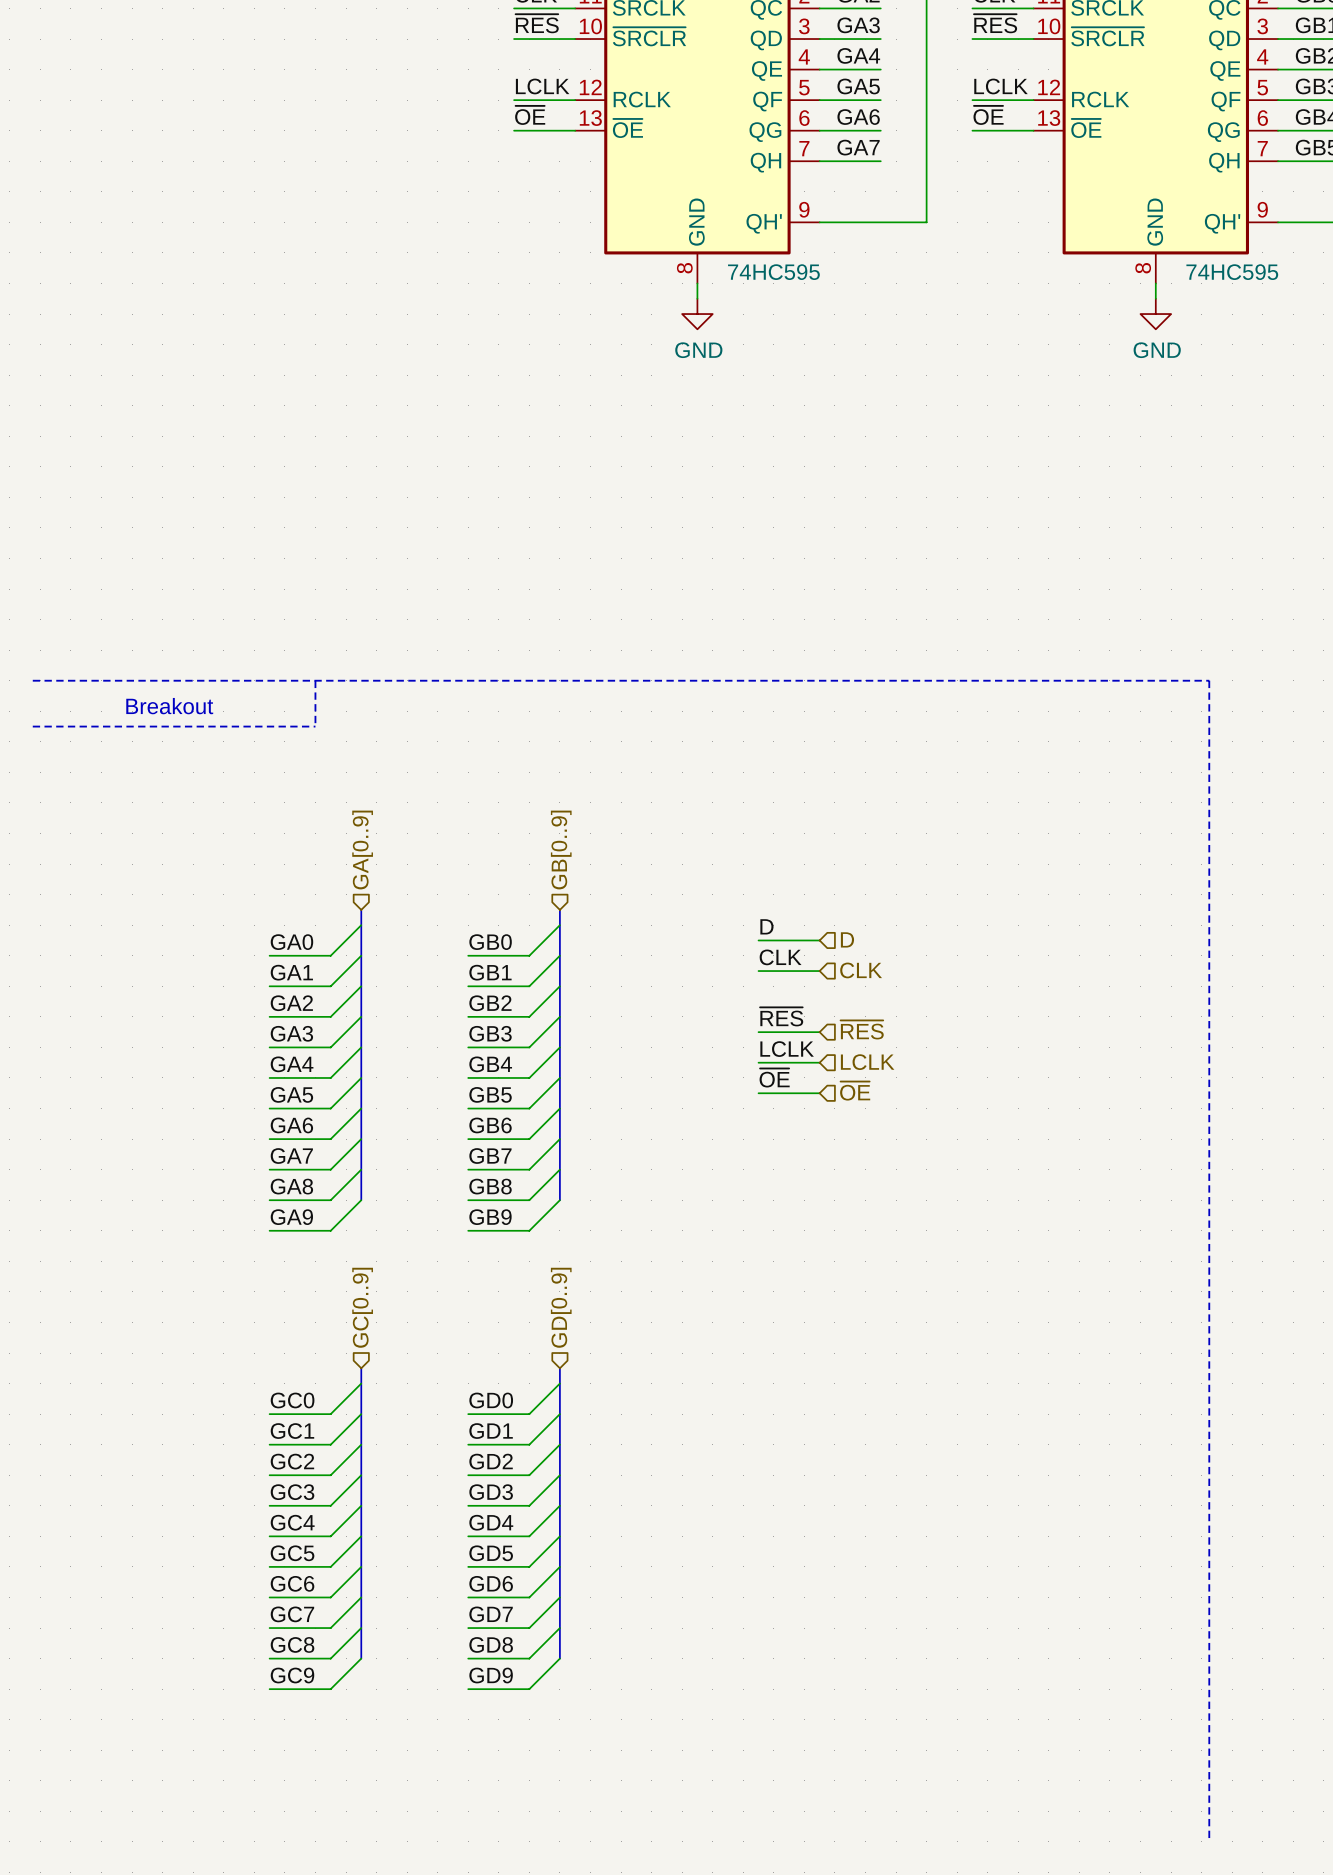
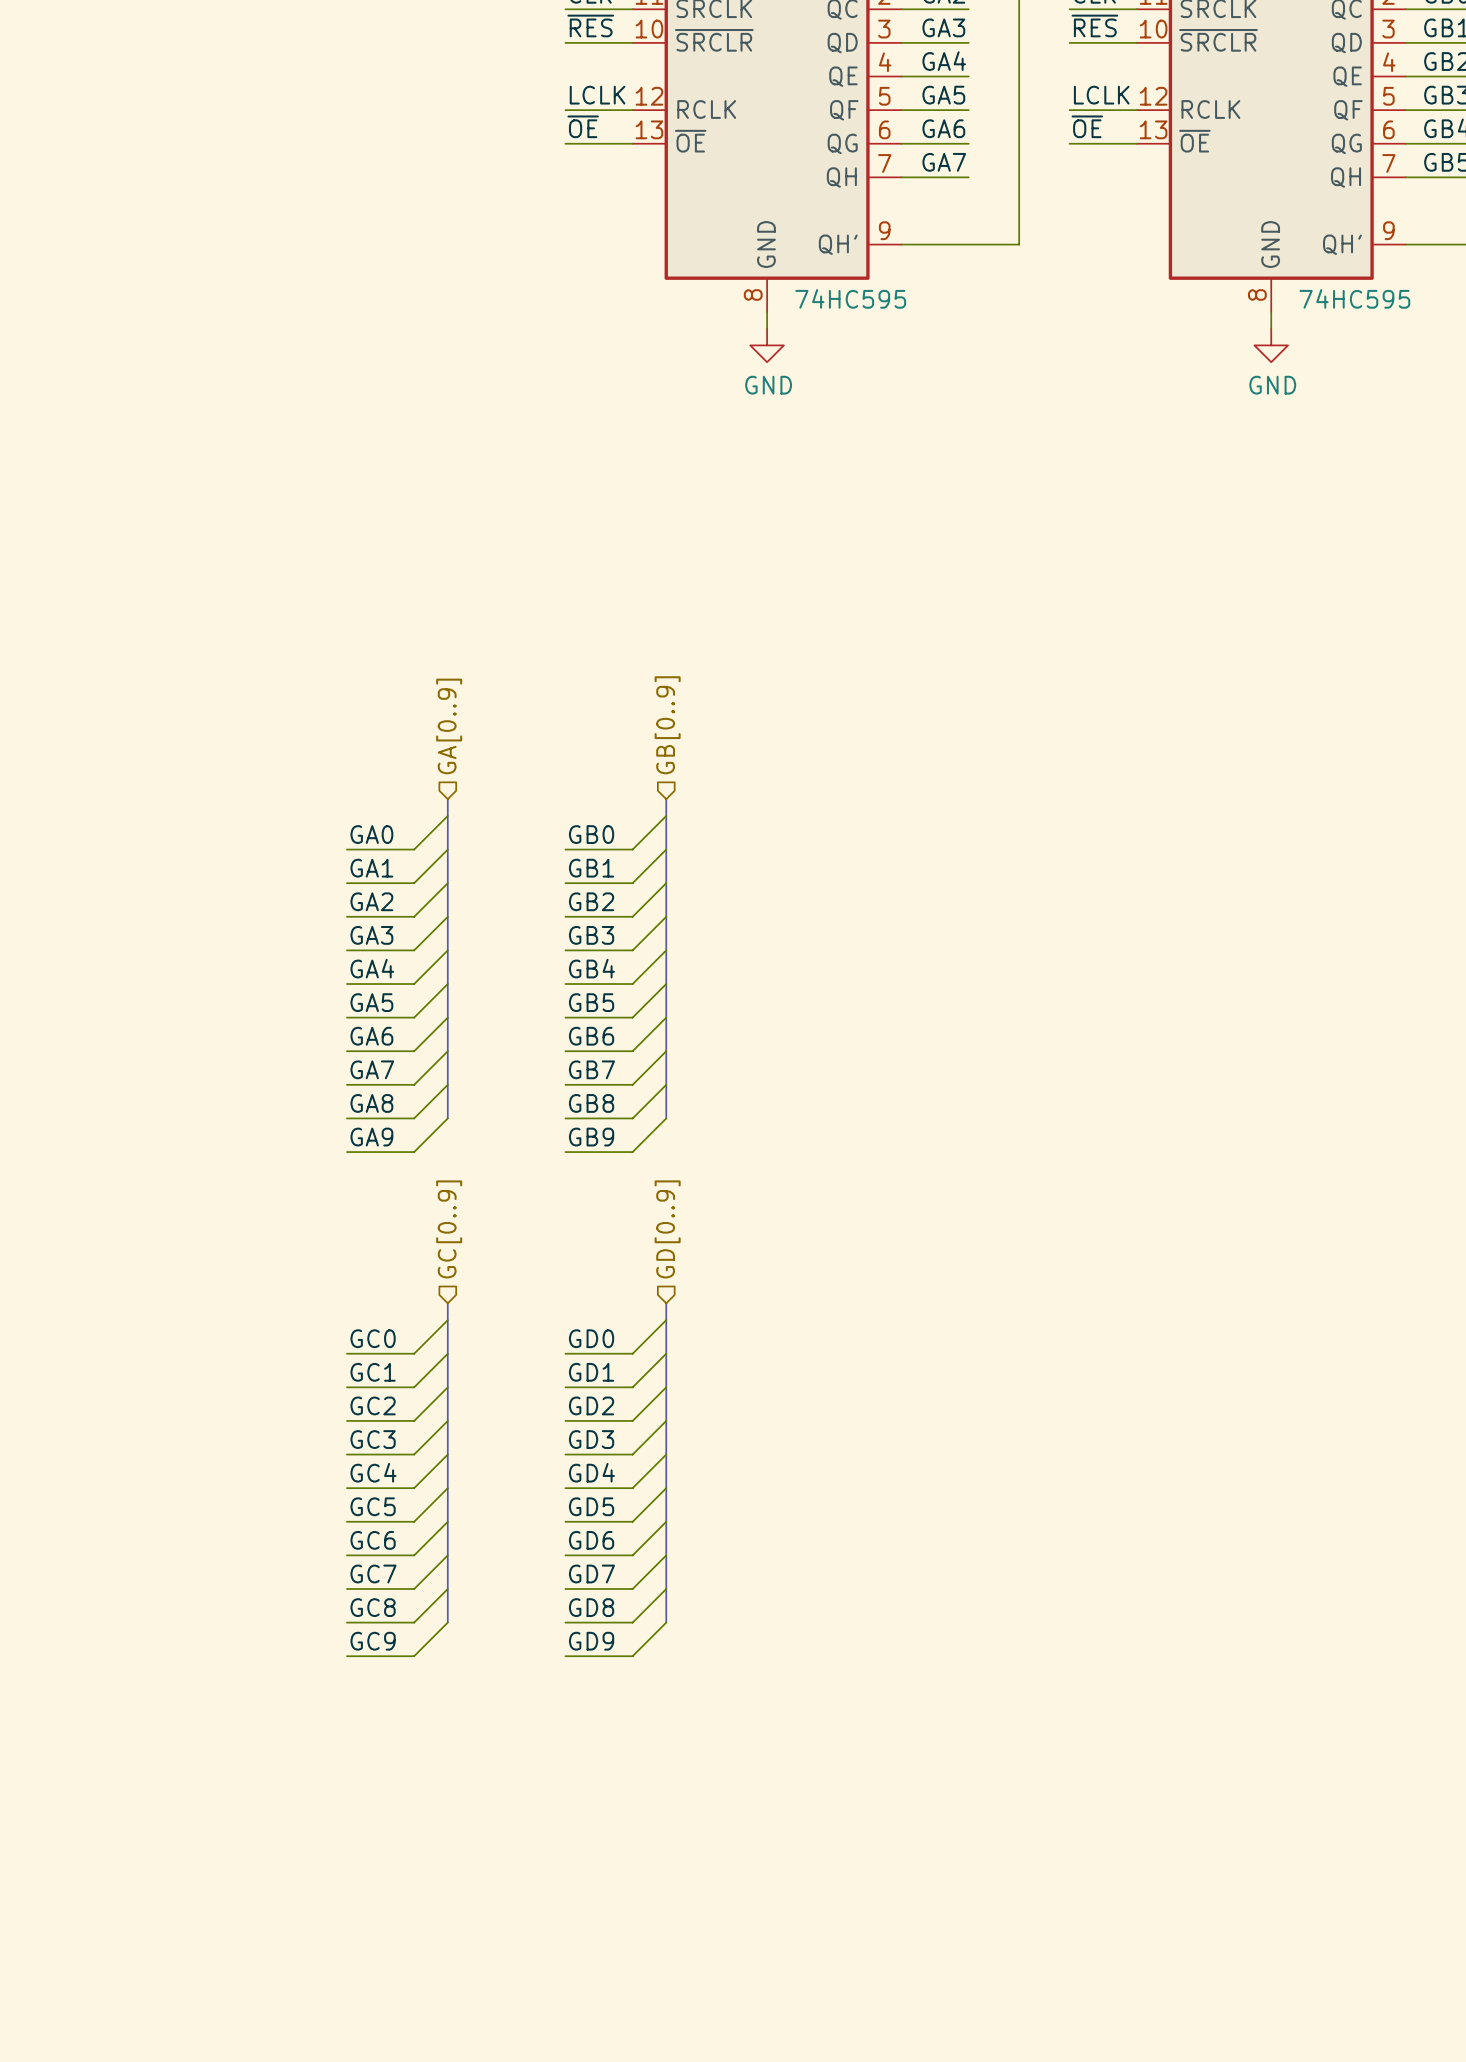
line: (32, 680) (1209, 680) (1209, 1841) -> none
line: (315, 680) (315, 726) (32, 726) -> none
text: Breakout (169, 706) -> none
wire: none -> (447, 815) (414, 849) (346, 849)
wire: none -> (666, 815) (632, 849) (565, 849)
hierarchical label position: GA[0..9] (362, 850) -> GA[0..9] (449, 726)
hierarchical label position: GB[0..9] (561, 850) -> GB[0..9] (667, 725)
bus: (361, 909) (361, 1200) -> (447, 799) (447, 1118)
bus: (559, 909) (559, 1200) -> (666, 799) (666, 1118)
wire: (361, 925) (330, 955) -> (447, 1017) (414, 1051) (363, 1051)
wire: (559, 925) (529, 955) -> (666, 1017) (632, 1051) (582, 1051)
label: D (766, 926) -> none
hierarchical label: D (847, 939) -> none
wire: (758, 940) (819, 940) -> none
label position: GA0 (291, 942) -> GA0 (371, 834)
label position: GB0 (490, 942) -> GB0 (591, 834)
wire: (269, 955) (315, 955) -> none
wire: (361, 955) (330, 986) -> (447, 1051) (414, 1084) (363, 1084)
wire: (468, 955) (514, 955) -> none
wire: (559, 955) (529, 986) -> (666, 1051) (632, 1084) (582, 1084)
label: CLK (780, 957) -> none
hierarchical label: CLK (861, 970) -> none
wire: (758, 971) (819, 971) -> none
label position: GA1 (291, 972) -> GA1 (371, 868)
label position: GB1 (490, 972) -> GB1 (591, 868)
wire: (269, 986) (315, 986) -> none
wire: (361, 986) (330, 1016) -> (447, 1084) (414, 1118) (363, 1118)
wire: (468, 986) (514, 986) -> none
wire: (559, 986) (529, 1016) -> (666, 1084) (632, 1118) (582, 1118)
label position: GA2 (291, 1003) -> GA2 (371, 901)
label position: GB2 (490, 1003) -> GB2 (591, 901)
wire: (269, 1016) (315, 1016) -> none
wire: (361, 1016) (330, 1047) -> (447, 1118) (414, 1152) (363, 1152)
wire: (468, 1016) (514, 1016) -> none
wire: (559, 1016) (529, 1047) -> (666, 1118) (632, 1152) (582, 1152)
label: ~{RES} (781, 1016) -> none
hierarchical label: ~{RES} (862, 1029) -> none
wire: (758, 1032) (819, 1032) -> none
label position: GA3 (291, 1033) -> GA3 (371, 935)
label position: GB3 (490, 1033) -> GB3 (591, 935)
wire: (269, 1047) (315, 1047) -> none
wire: (361, 1047) (330, 1077) (269, 1077) -> (447, 849) (414, 883) (346, 883)
wire: (468, 1047) (514, 1047) -> none
wire: (559, 1047) (529, 1077) (468, 1077) -> (666, 849) (632, 883) (565, 883)
label: LCLK (787, 1049) -> none
wire: (758, 1062) (819, 1062) -> none
hierarchical label: LCLK (867, 1062) -> none
label position: GA4 (292, 1064) -> GA4 (372, 968)
label position: GB4 (490, 1064) -> GB4 (591, 968)
wire: (361, 1077) (330, 1108) (269, 1108) -> (447, 883) (414, 916) (346, 916)
wire: (559, 1077) (529, 1108) (468, 1108) -> (666, 883) (632, 916) (565, 916)
label: ~{OE} (774, 1077) -> none
hierarchical label: ~{OE} (855, 1091) -> none
wire: (758, 1093) (819, 1093) -> none
label position: GA5 (291, 1094) -> GA5 (371, 1002)
label position: GB5 (490, 1094) -> GB5 (591, 1002)
wire: (361, 1108) (330, 1139) (269, 1139) -> (447, 916) (414, 950) (346, 950)
wire: (559, 1108) (529, 1139) (468, 1139) -> (666, 916) (632, 950) (565, 950)
label position: GA6 (291, 1125) -> GA6 (371, 1036)
label position: GB6 (490, 1125) -> GB6 (591, 1036)
wire: (361, 1139) (330, 1169) (269, 1169) -> (447, 950) (414, 984) (346, 984)
wire: (559, 1139) (529, 1169) (468, 1169) -> (666, 950) (632, 984) (565, 984)
label position: GA7 (291, 1156) -> GA7 (372, 1069)
label position: GB7 (490, 1156) -> GB7 (591, 1069)
wire: (361, 1169) (330, 1200) (269, 1200) -> (447, 984) (414, 1017) (346, 1017)
wire: (559, 1169) (529, 1200) (468, 1200) -> (666, 984) (632, 1017) (565, 1017)
label position: GA8 (291, 1186) -> GA8 (371, 1103)
label position: GB8 (490, 1186) -> GB8 (591, 1103)
wire: (361, 1200) (330, 1230) -> (447, 1320) (414, 1353) (363, 1353)
wire: (559, 1200) (529, 1230) -> (666, 1320) (632, 1353) (582, 1353)
label position: GA9 (291, 1217) -> GA9 (371, 1137)
label position: GB9 (490, 1217) -> GB9 (591, 1137)
wire: (269, 1230) (315, 1230) -> none
wire: (468, 1230) (514, 1230) -> none
hierarchical label position: GC[0..9] (362, 1307) -> GC[0..9] (449, 1229)
hierarchical label position: GD[0..9] (561, 1307) -> GD[0..9] (667, 1229)
bus: (361, 1368) (361, 1658) -> (447, 1303) (447, 1622)
bus: (559, 1368) (559, 1658) -> (666, 1303) (666, 1622)
wire: (361, 1383) (330, 1414) -> (447, 1521) (414, 1555) (363, 1555)
wire: (559, 1383) (529, 1414) -> (666, 1521) (632, 1555) (582, 1555)
label position: GC0 (292, 1400) -> GC0 (373, 1338)
label position: GD0 (491, 1400) -> GD0 (591, 1338)
wire: (269, 1414) (315, 1414) -> none
wire: (361, 1414) (330, 1444) -> (447, 1555) (414, 1588) (363, 1588)
wire: (468, 1414) (514, 1414) -> none
wire: (559, 1414) (529, 1444) -> (666, 1555) (632, 1588) (582, 1588)
label position: GC1 (292, 1431) -> GC1 (373, 1372)
label position: GD1 (491, 1431) -> GD1 (591, 1372)
wire: (269, 1444) (315, 1444) -> none
wire: (361, 1444) (330, 1475) -> (447, 1588) (414, 1622) (363, 1622)
wire: (468, 1444) (514, 1444) -> none
wire: (559, 1444) (529, 1475) -> (666, 1588) (632, 1622) (582, 1622)
label position: GC2 (292, 1461) -> GC2 (373, 1405)
label position: GD2 (491, 1461) -> GD2 (591, 1405)
wire: (269, 1475) (315, 1475) -> none
wire: (361, 1475) (330, 1505) -> (447, 1622) (414, 1656) (363, 1656)
wire: (468, 1475) (514, 1475) -> none
wire: (559, 1475) (529, 1505) -> (666, 1622) (632, 1656) (582, 1656)
label position: GC3 (292, 1492) -> GC3 (373, 1439)
label position: GD3 (491, 1492) -> GD3 (591, 1439)
wire: (269, 1505) (315, 1505) -> none
wire: (361, 1505) (330, 1536) (269, 1536) -> (447, 1353) (414, 1387) (346, 1387)
wire: (468, 1505) (514, 1505) -> none
wire: (559, 1505) (529, 1536) (468, 1536) -> (666, 1353) (632, 1387) (565, 1387)
label position: GC4 (292, 1522) -> GC4 (373, 1472)
label position: GD4 (491, 1522) -> GD4 (591, 1472)
wire: (361, 1536) (330, 1566) (269, 1566) -> (447, 1387) (414, 1420) (346, 1420)
wire: (559, 1536) (529, 1566) (468, 1566) -> (666, 1387) (632, 1420) (565, 1420)
label position: GC5 (292, 1553) -> GC5 (373, 1506)
label position: GD5 (491, 1553) -> GD5 (591, 1506)
wire: (361, 1566) (330, 1597) (269, 1597) -> (447, 1420) (414, 1454) (346, 1454)
wire: (559, 1566) (529, 1597) (468, 1597) -> (666, 1420) (632, 1454) (565, 1454)
label position: GC6 (292, 1583) -> GC6 (373, 1540)
label position: GD6 (491, 1583) -> GD6 (591, 1540)
wire: (361, 1597) (330, 1628) (269, 1628) -> (447, 1454) (414, 1488) (346, 1488)
wire: (559, 1597) (529, 1628) (468, 1628) -> (666, 1454) (632, 1488) (565, 1488)
label position: GC7 (292, 1614) -> GC7 (373, 1573)
label position: GD7 (491, 1614) -> GD7 (591, 1573)
wire: (361, 1628) (330, 1658) (269, 1658) -> (447, 1488) (414, 1521) (346, 1521)
wire: (559, 1628) (529, 1658) (468, 1658) -> (666, 1488) (632, 1521) (565, 1521)
label position: GC8 (292, 1644) -> GC8 (373, 1607)
label position: GD8 (491, 1644) -> GD8 (591, 1607)
wire: (361, 1658) (330, 1689) (269, 1689) -> none
wire: (559, 1658) (529, 1689) (468, 1689) -> none
label position: GC9 (292, 1675) -> GC9 (373, 1641)
label position: GD9 (491, 1675) -> GD9 (591, 1641)

